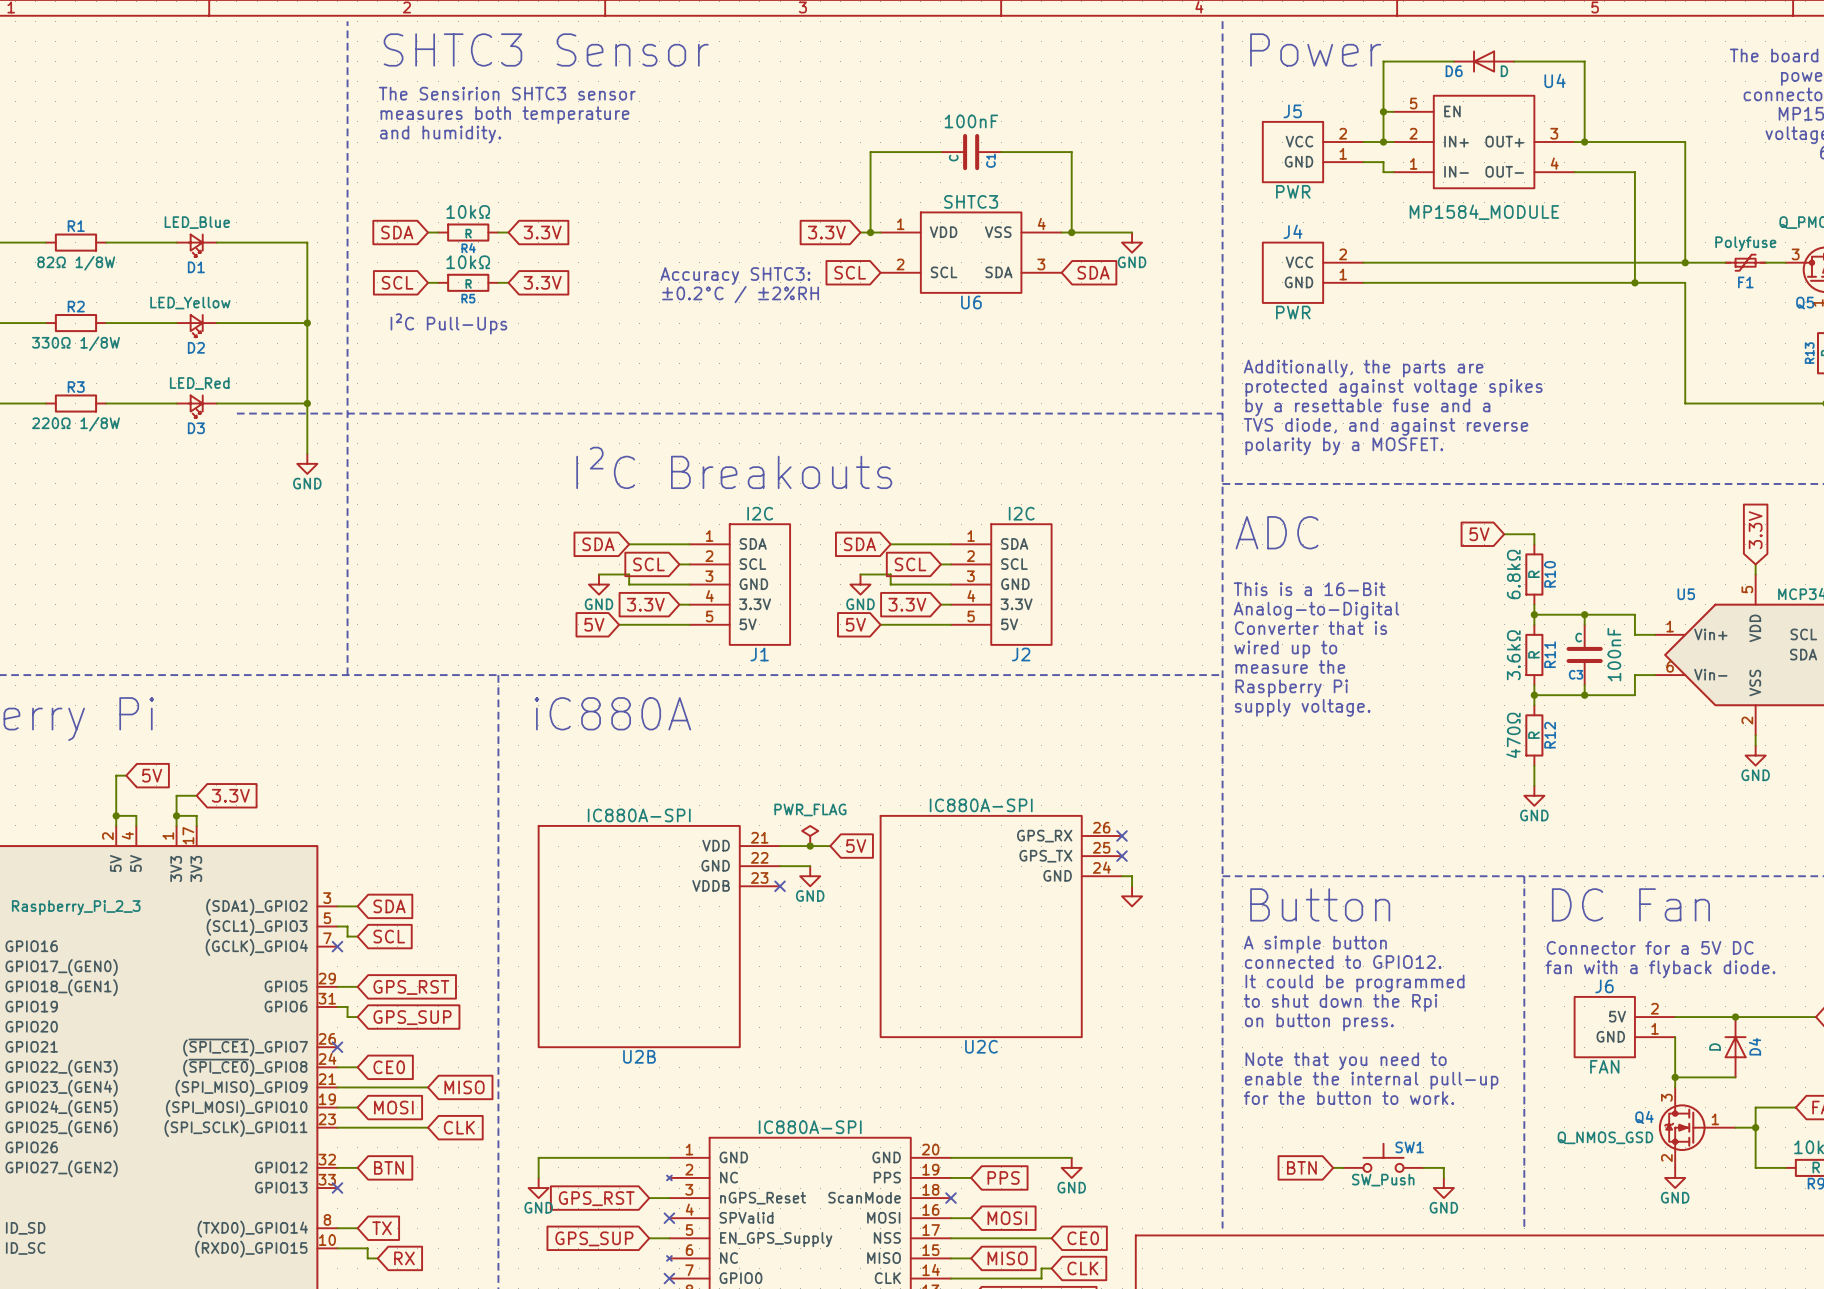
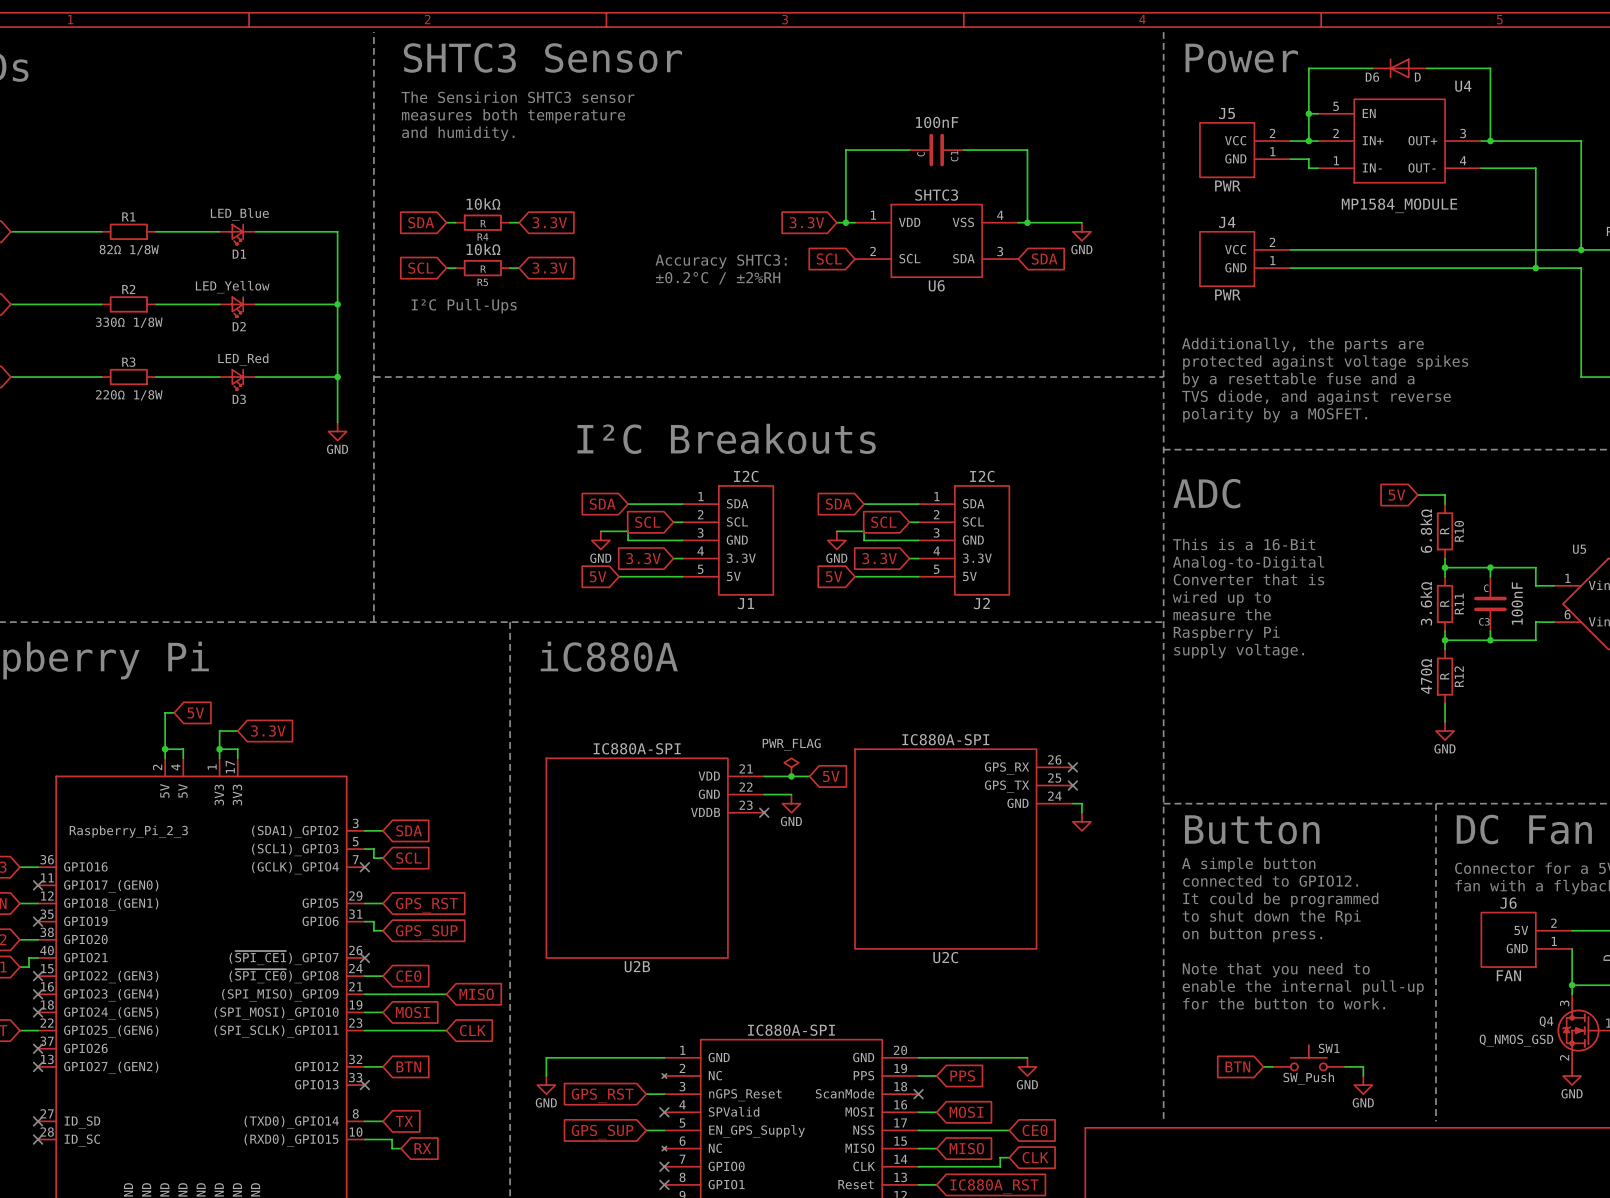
line: none -> (373, 377) (1163, 377)
line: (236, 413) (1222, 413) -> none

